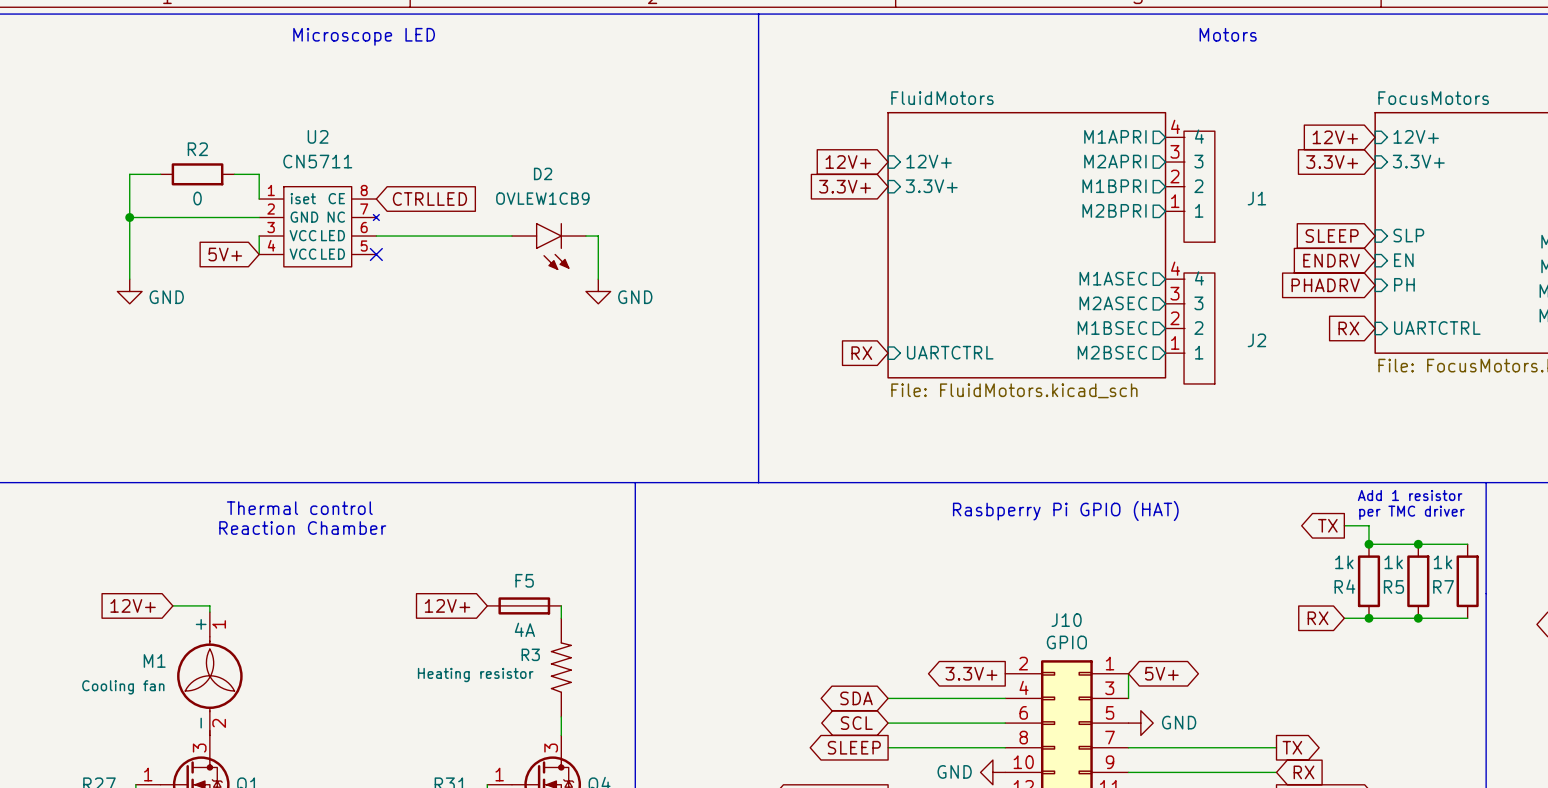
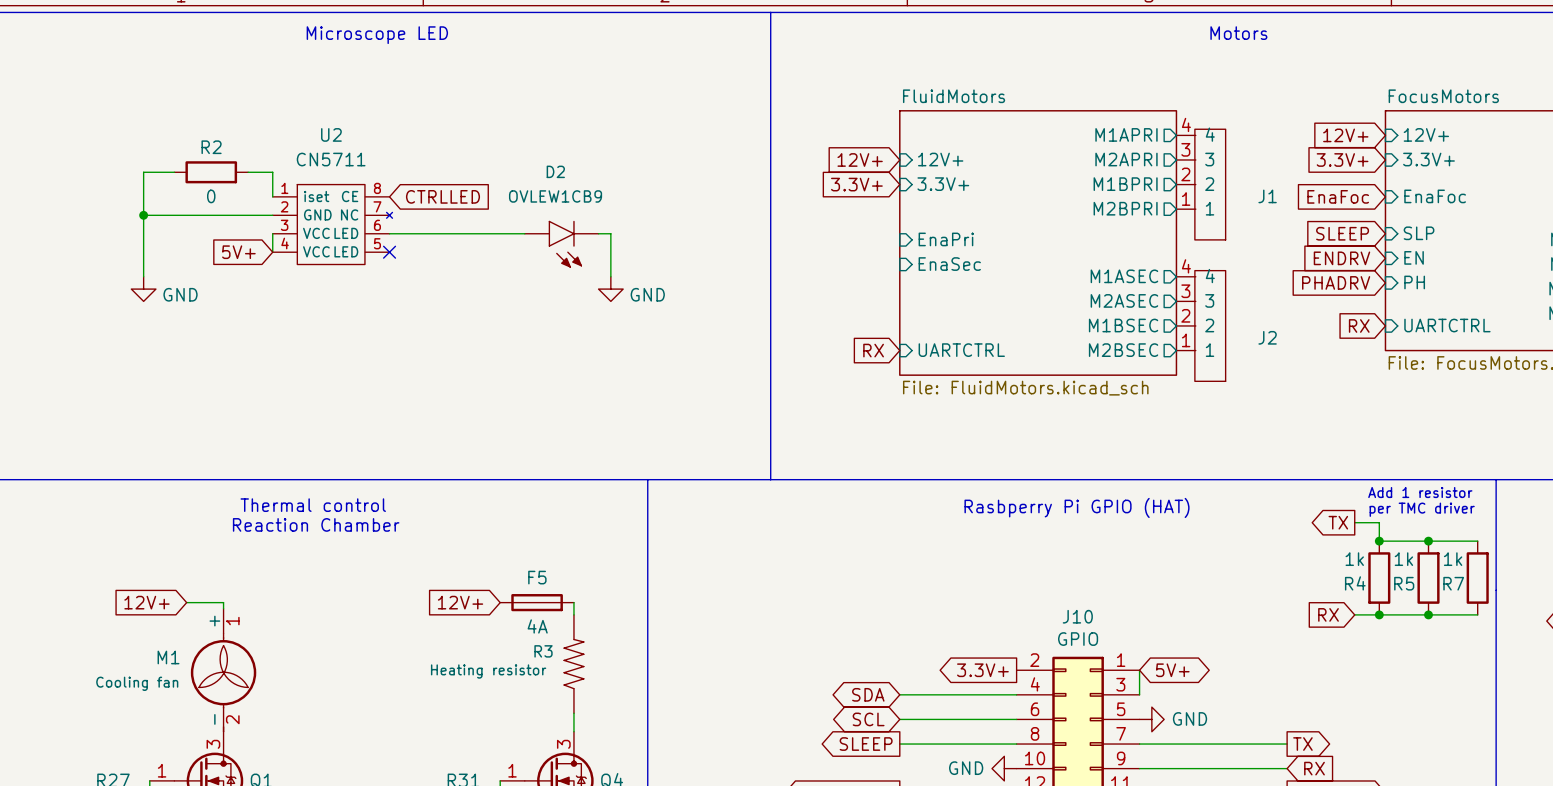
sheet pin: none -> EnaFoc (1435, 196)
global label: none -> EnaFoc (1338, 196)
sheet pin: none -> EnaPri (946, 239)
sheet pin: none -> EnaSec (949, 264)

